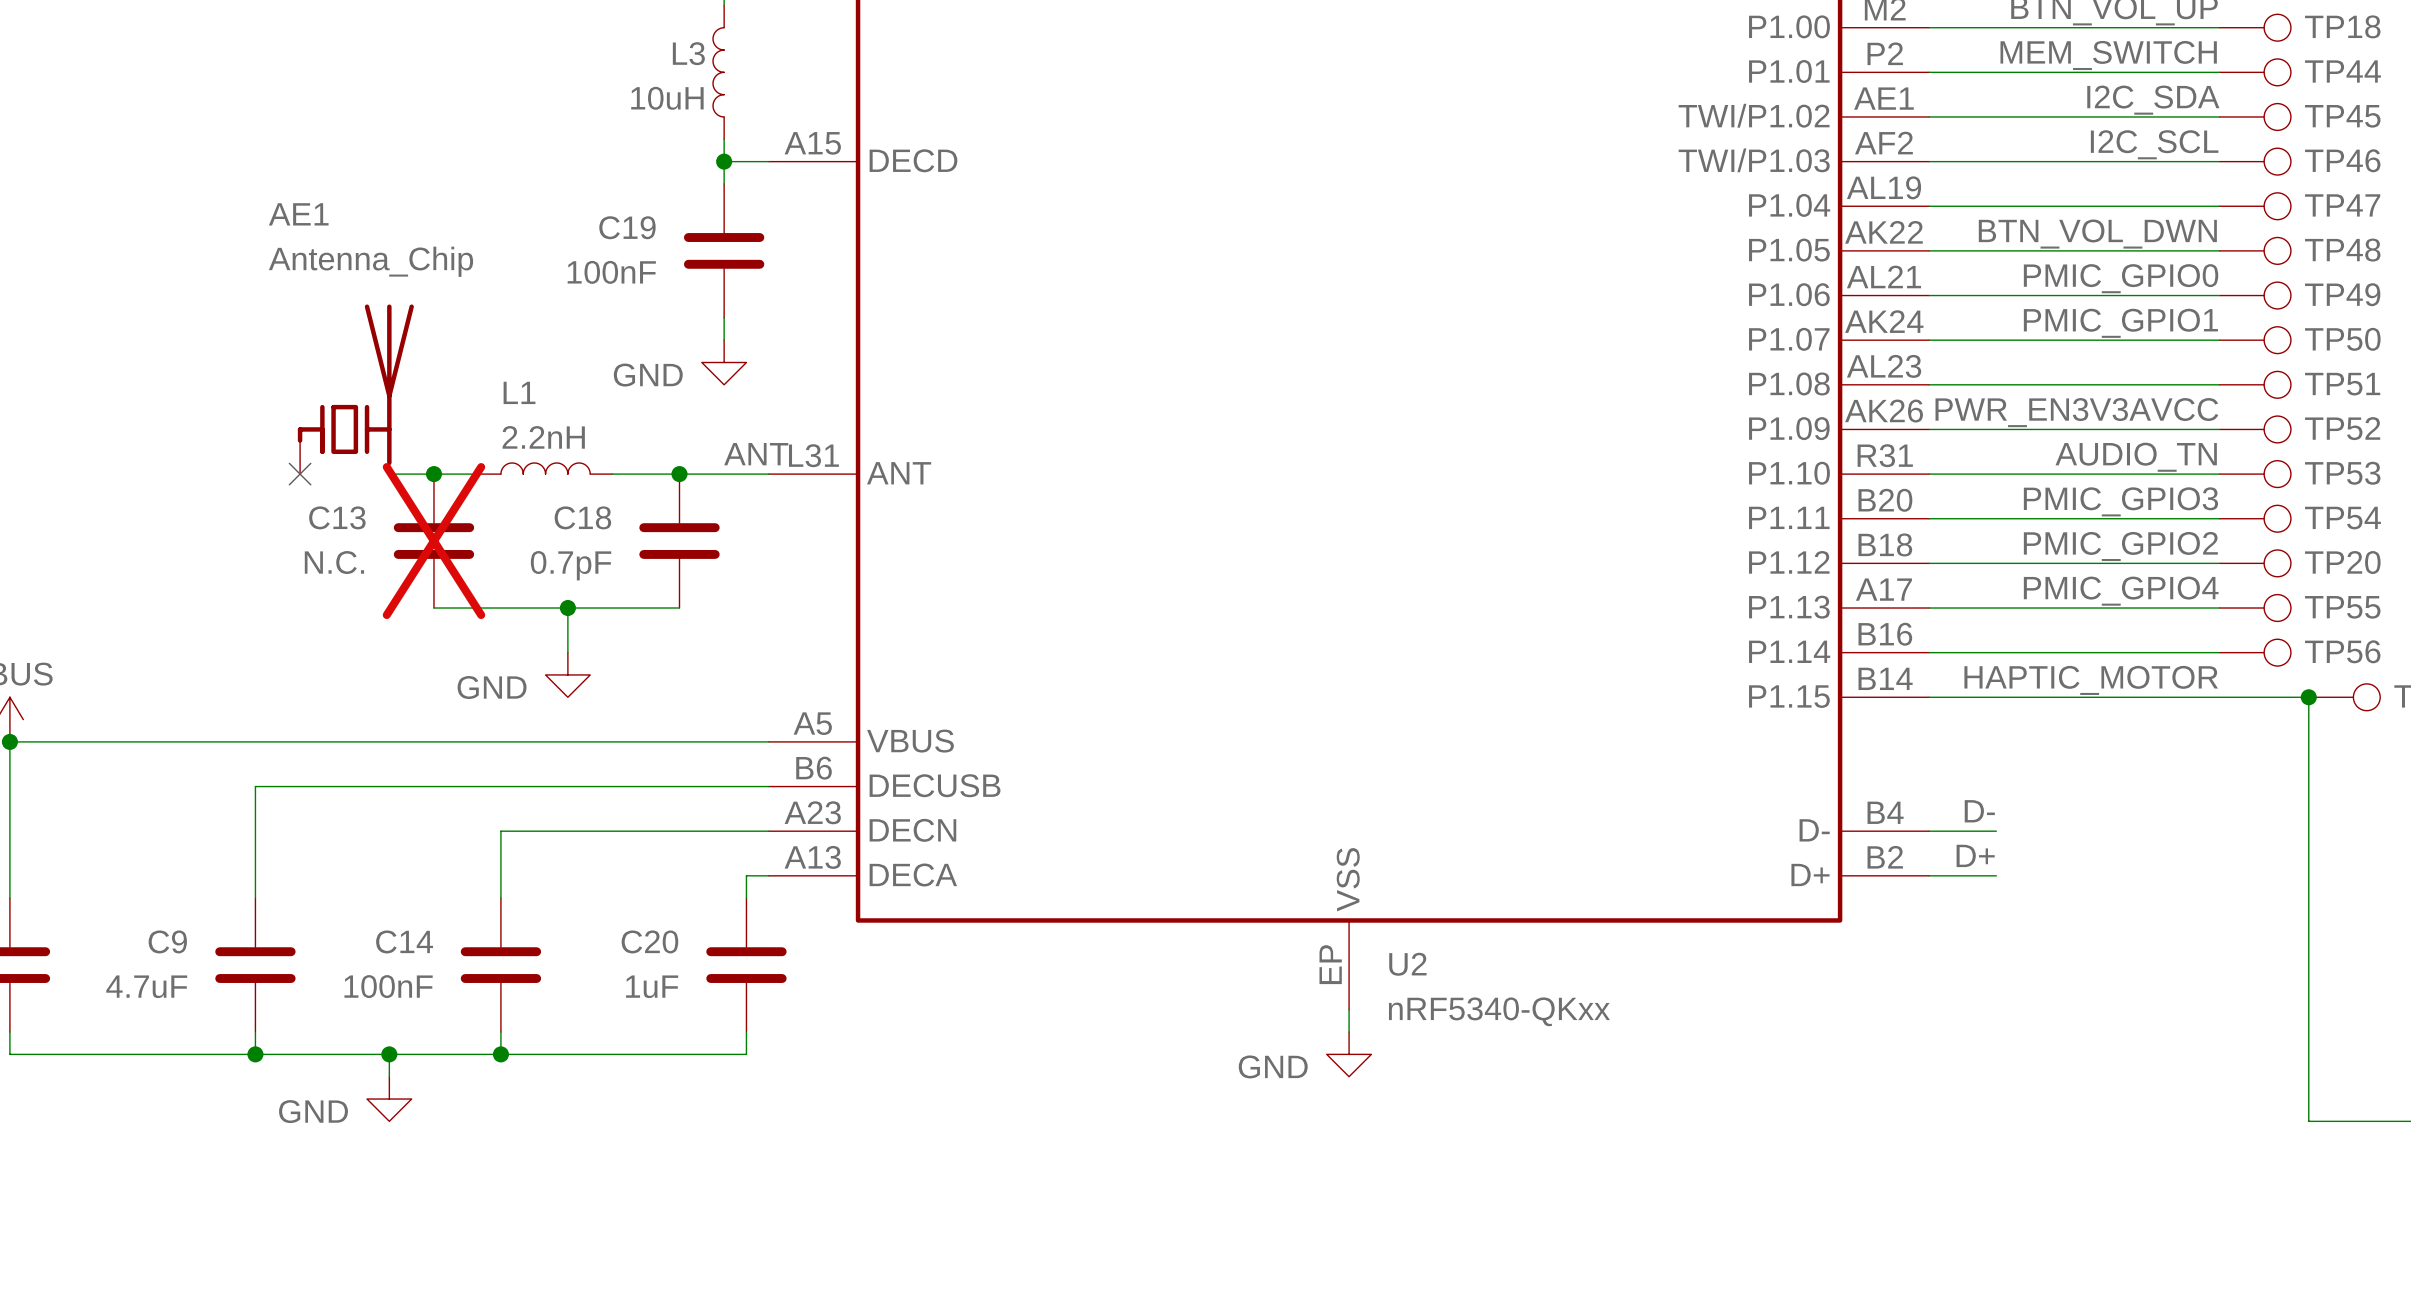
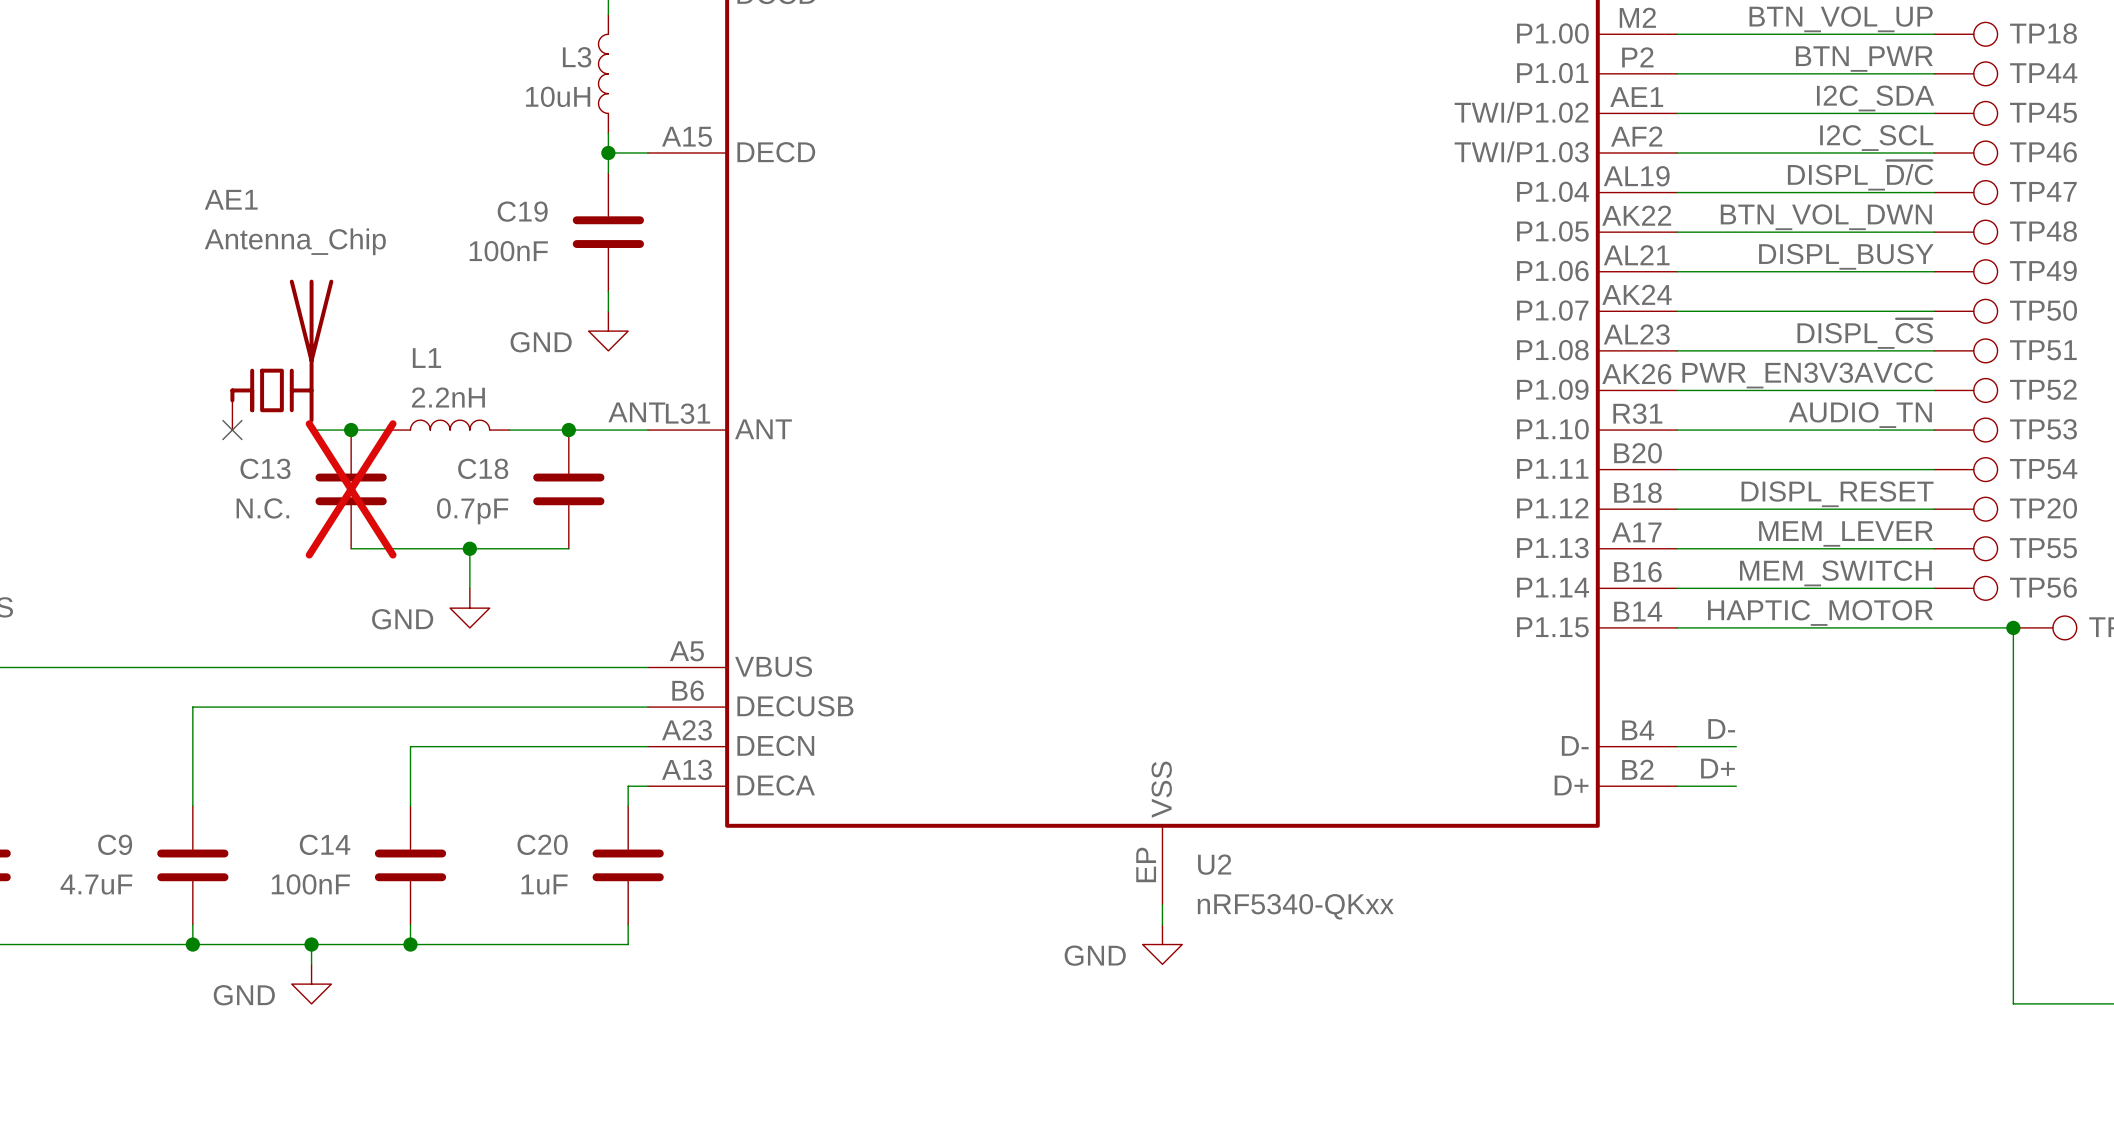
label: MEM_SWITCH (2108, 55) -> BTN_PWR (1864, 59)
label: none -> DISPL_~{D/C} (1860, 175)
label: PMIC_GPIO0 (2121, 278) -> DISPL_BUSY (1846, 256)
label: PMIC_GPIO1 (2120, 323) -> none
label: none -> DISPL_~{CS} (1865, 333)
label: PMIC_GPIO3 (2120, 501) -> none
label: PMIC_GPIO2 (2120, 546) -> DISPL_RESET (1837, 494)
label: PMIC_GPIO4 (2121, 591) -> MEM_LEVER (1846, 533)
label: none -> MEM_SWITCH (1835, 573)

